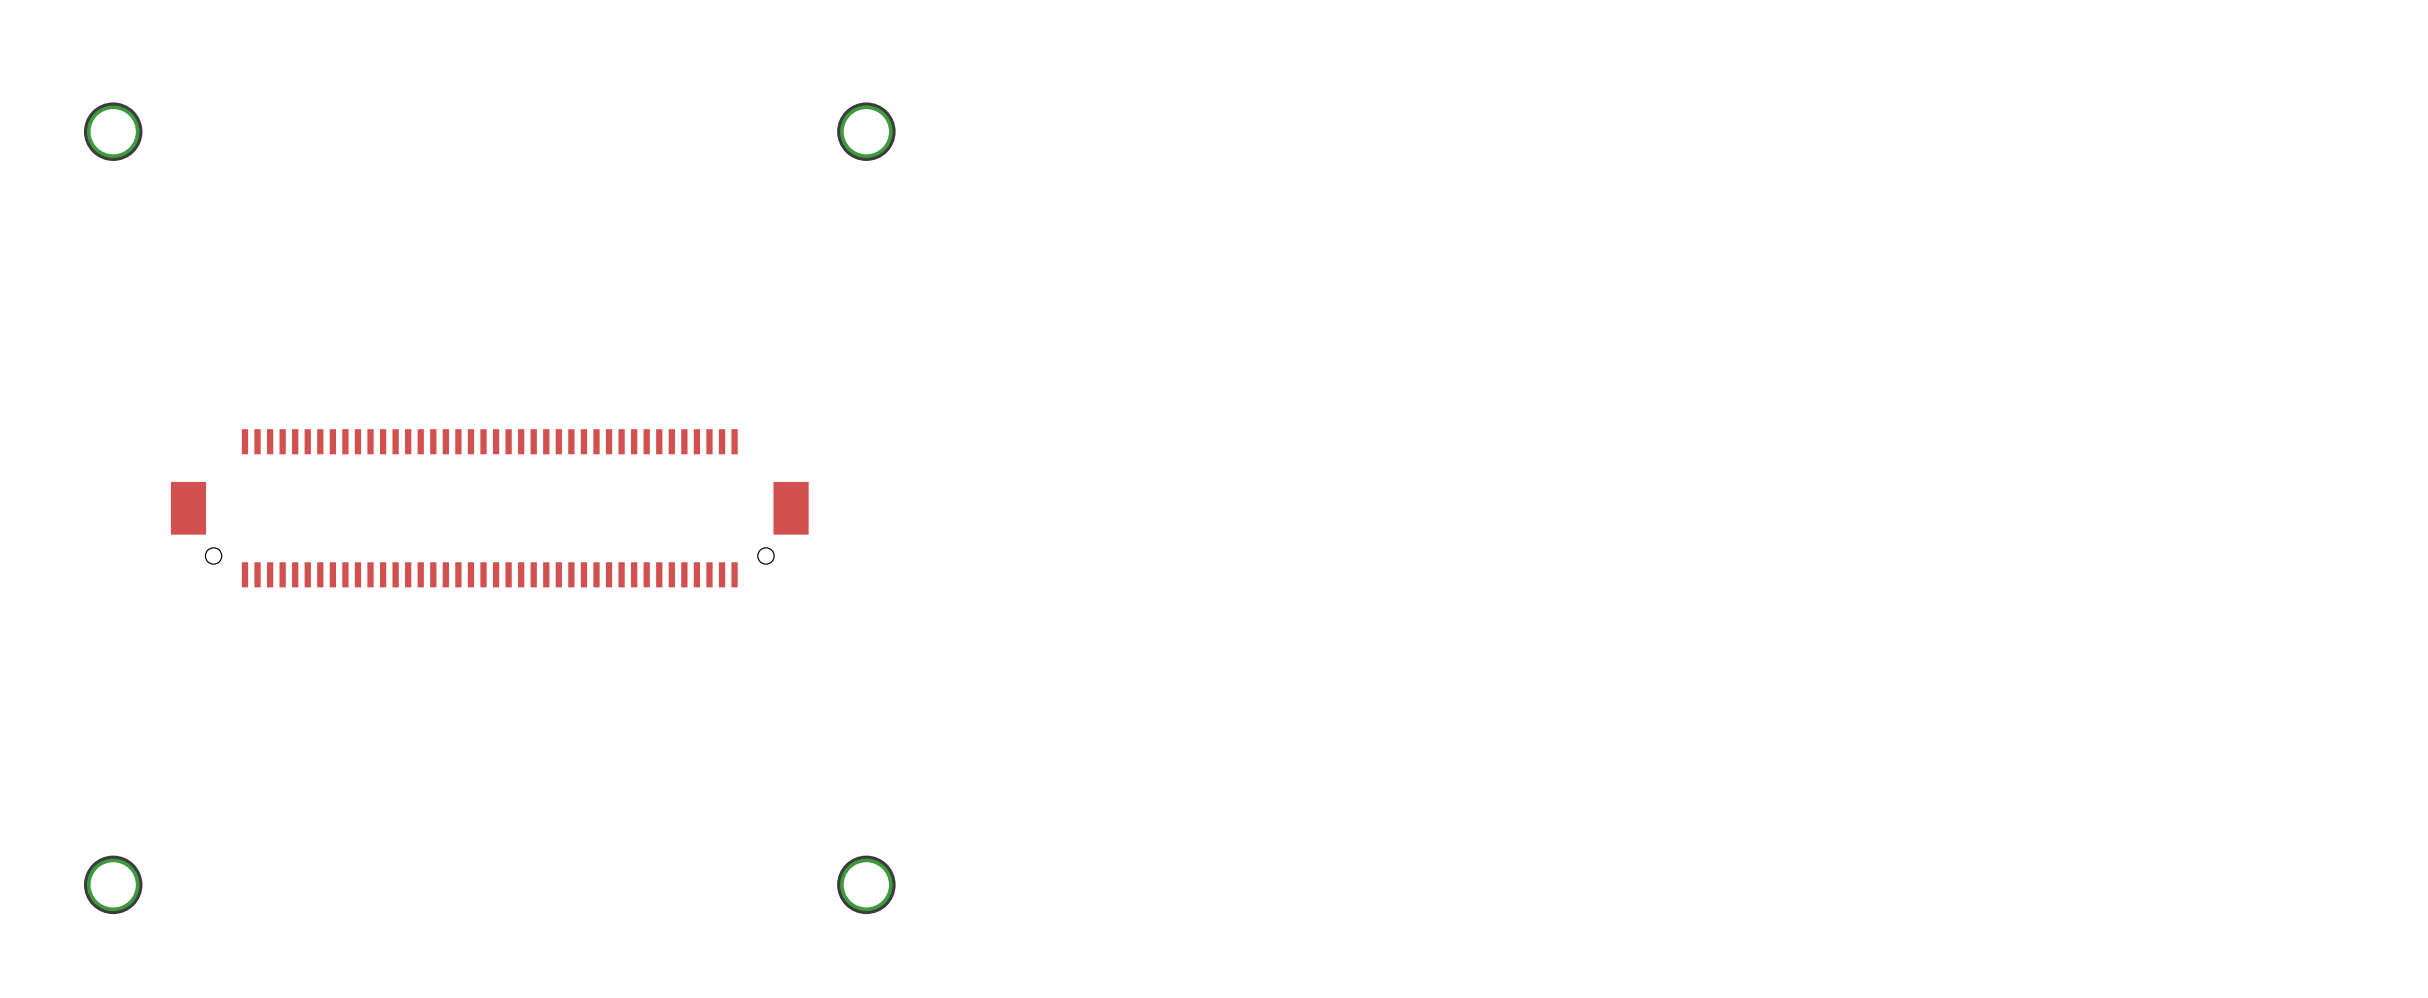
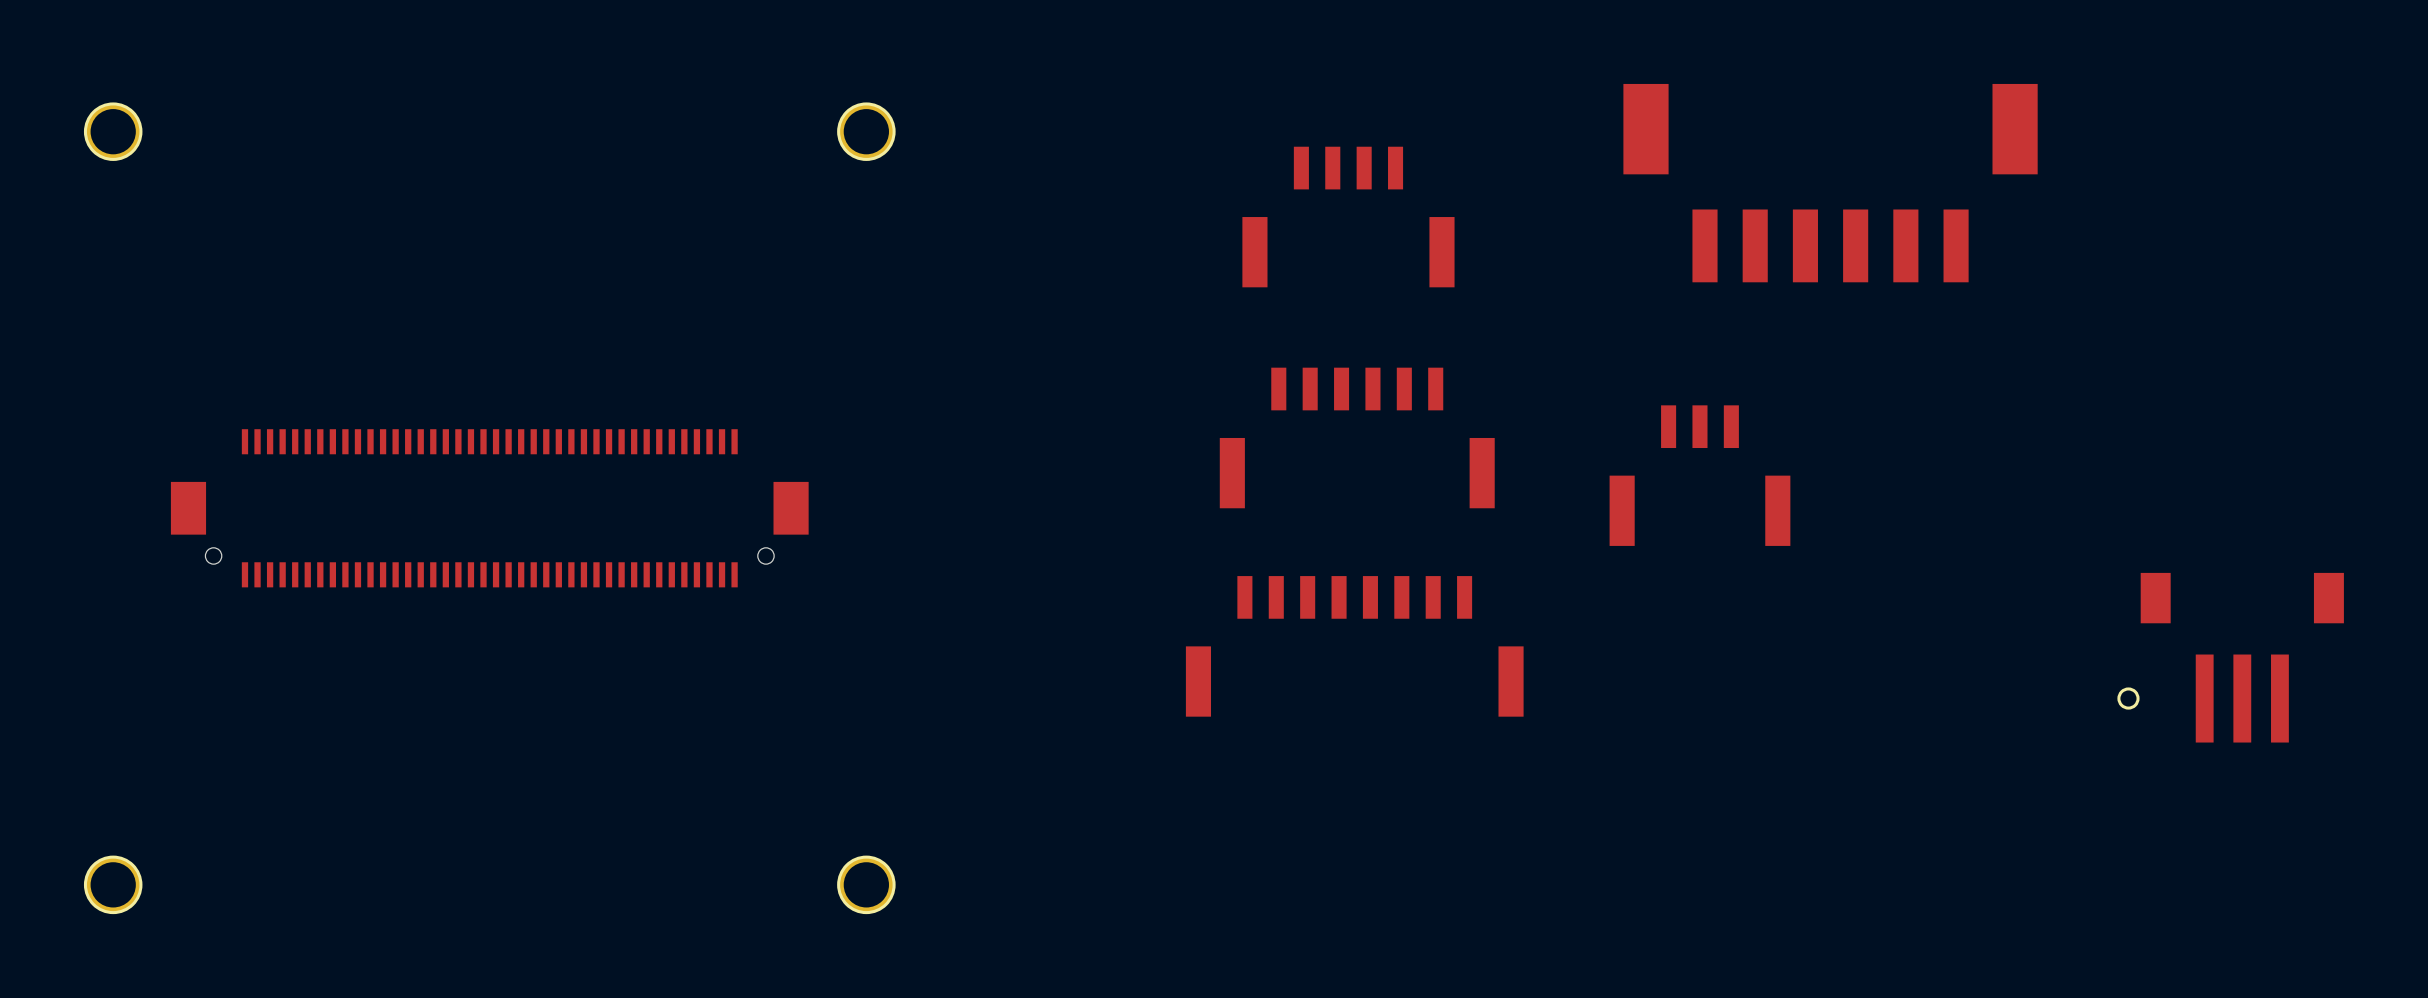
part: none -> (1830, 183)
part: none -> (1348, 217)
part: none -> (1357, 437)
part: none -> (1699, 475)
part: none -> (1354, 646)
part: none -> (2230, 657)

